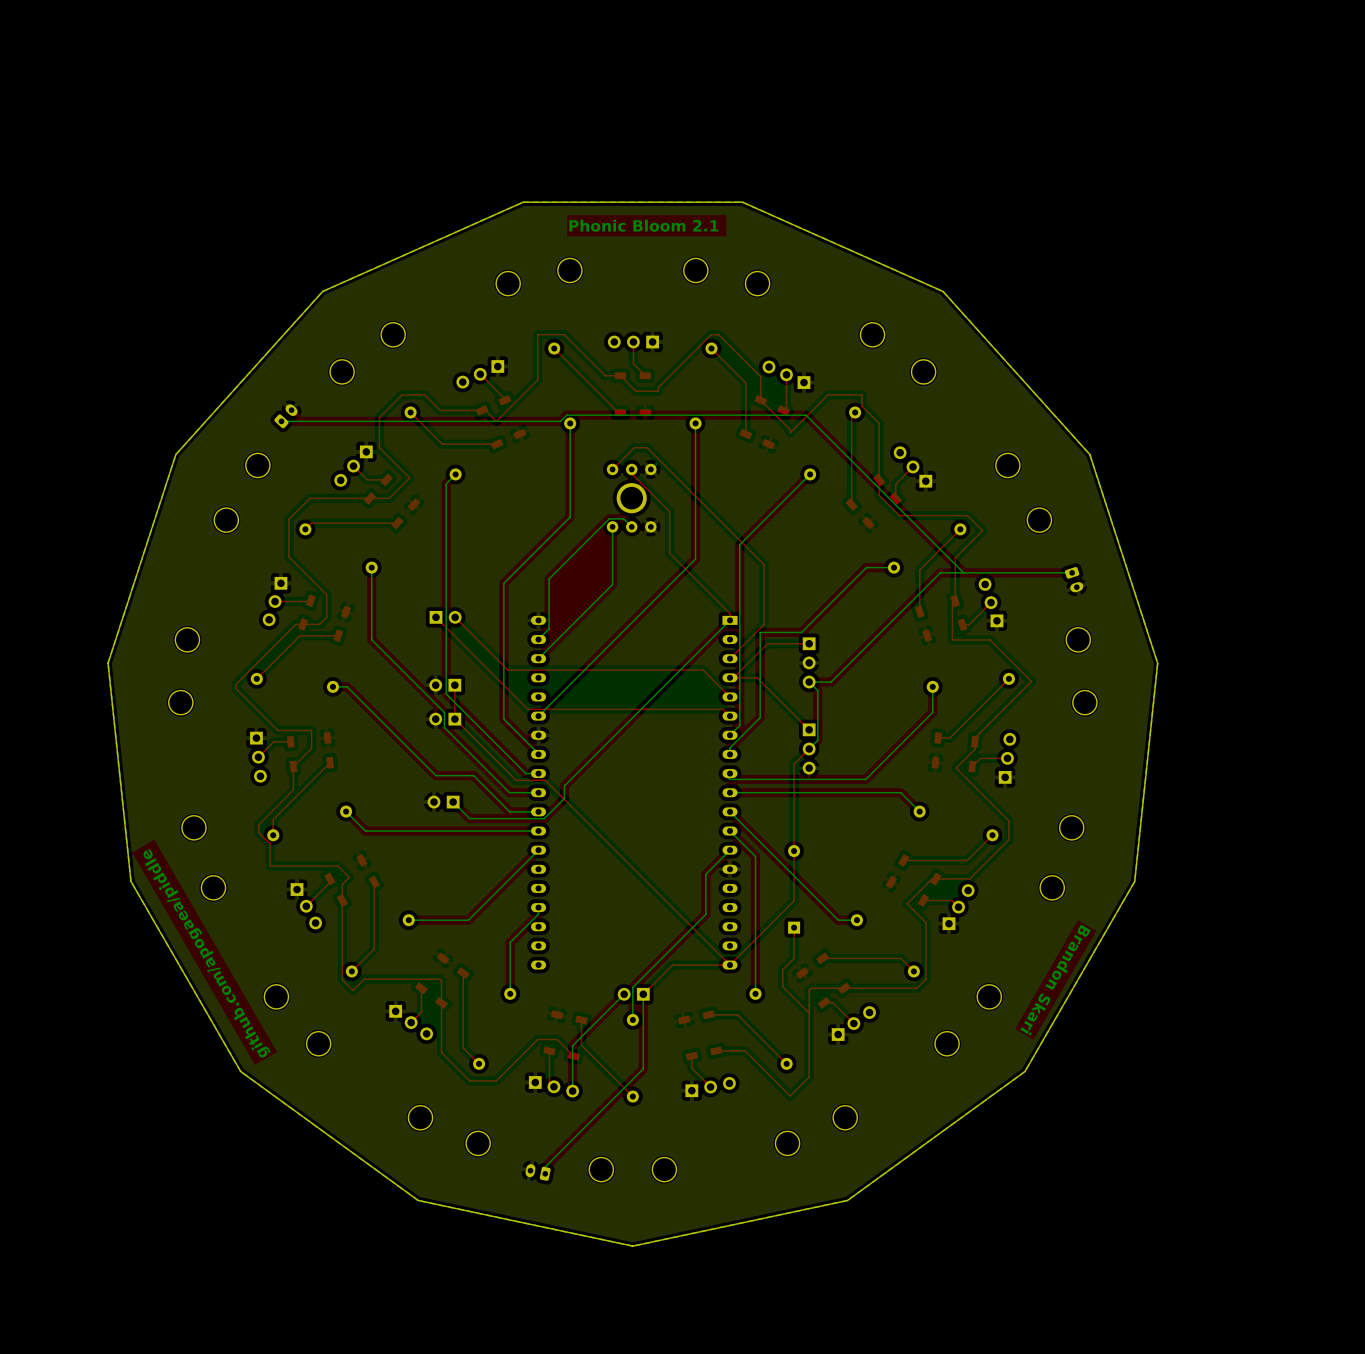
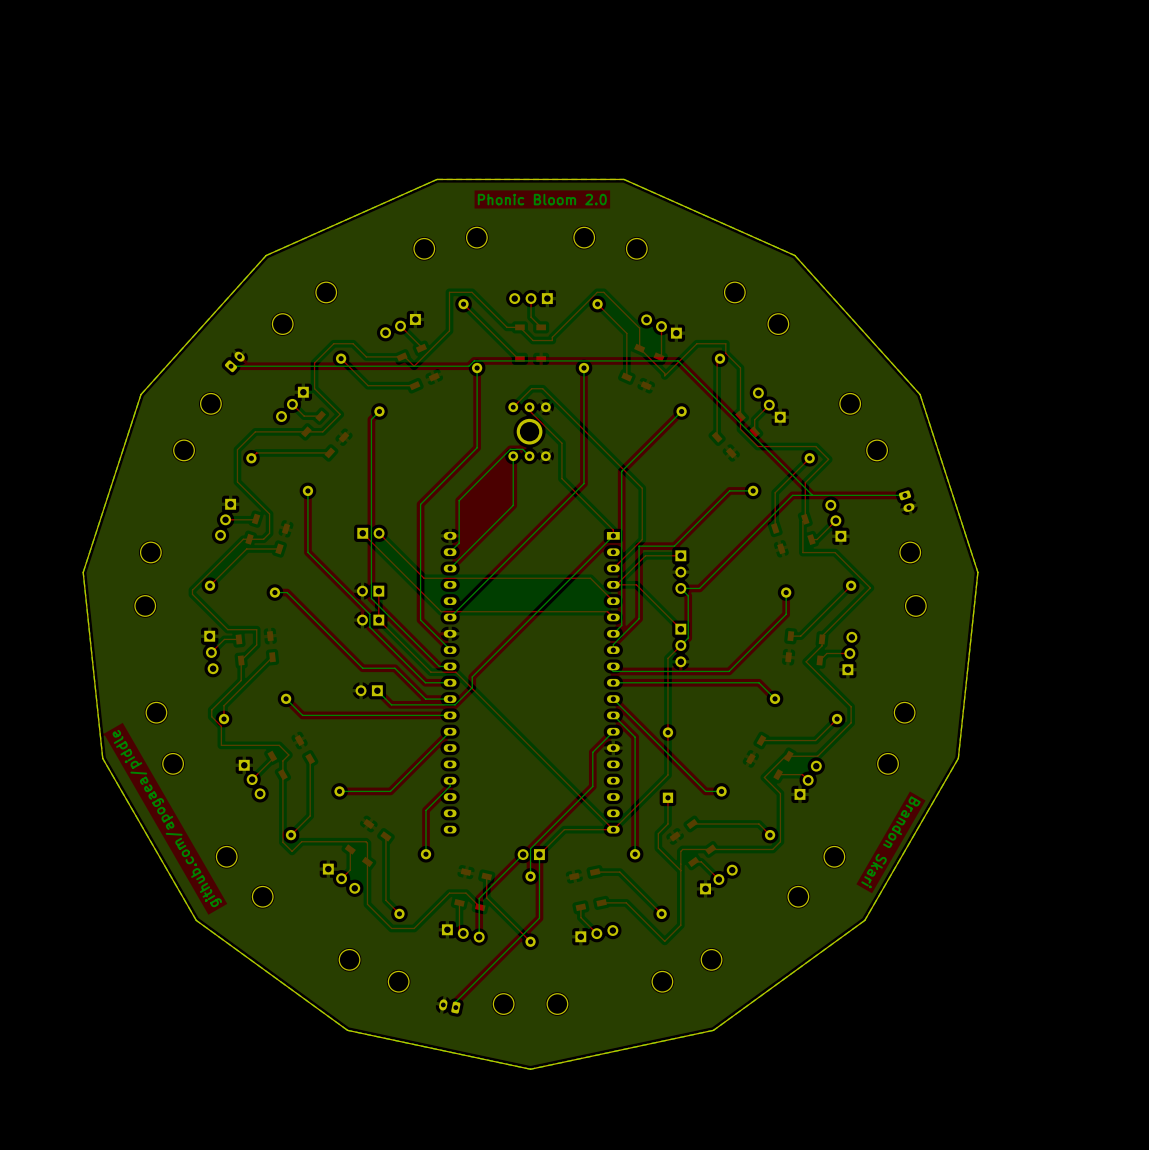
text: Phonic Bloom 2.1 (643, 225) -> Phonic Bloom 2.0 (542, 199)

